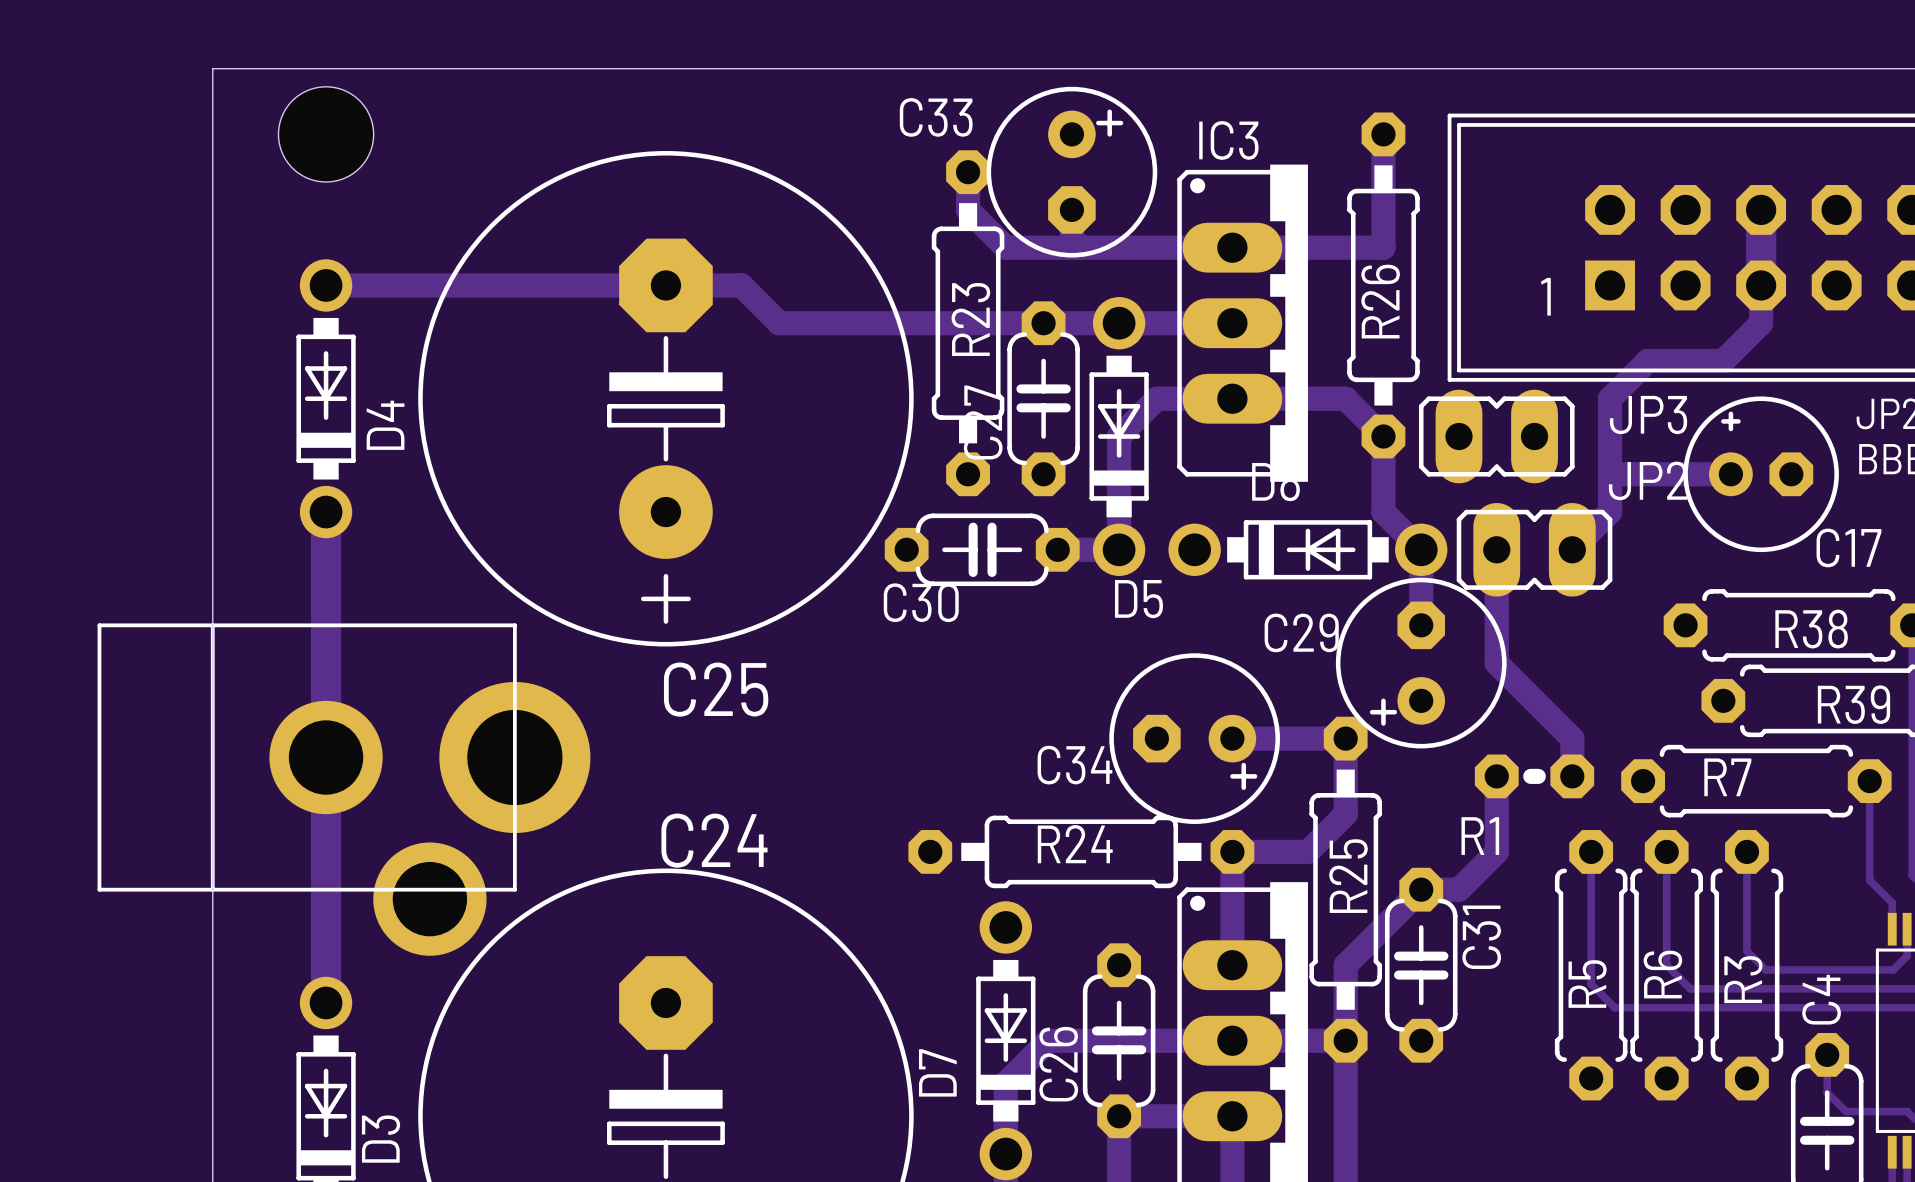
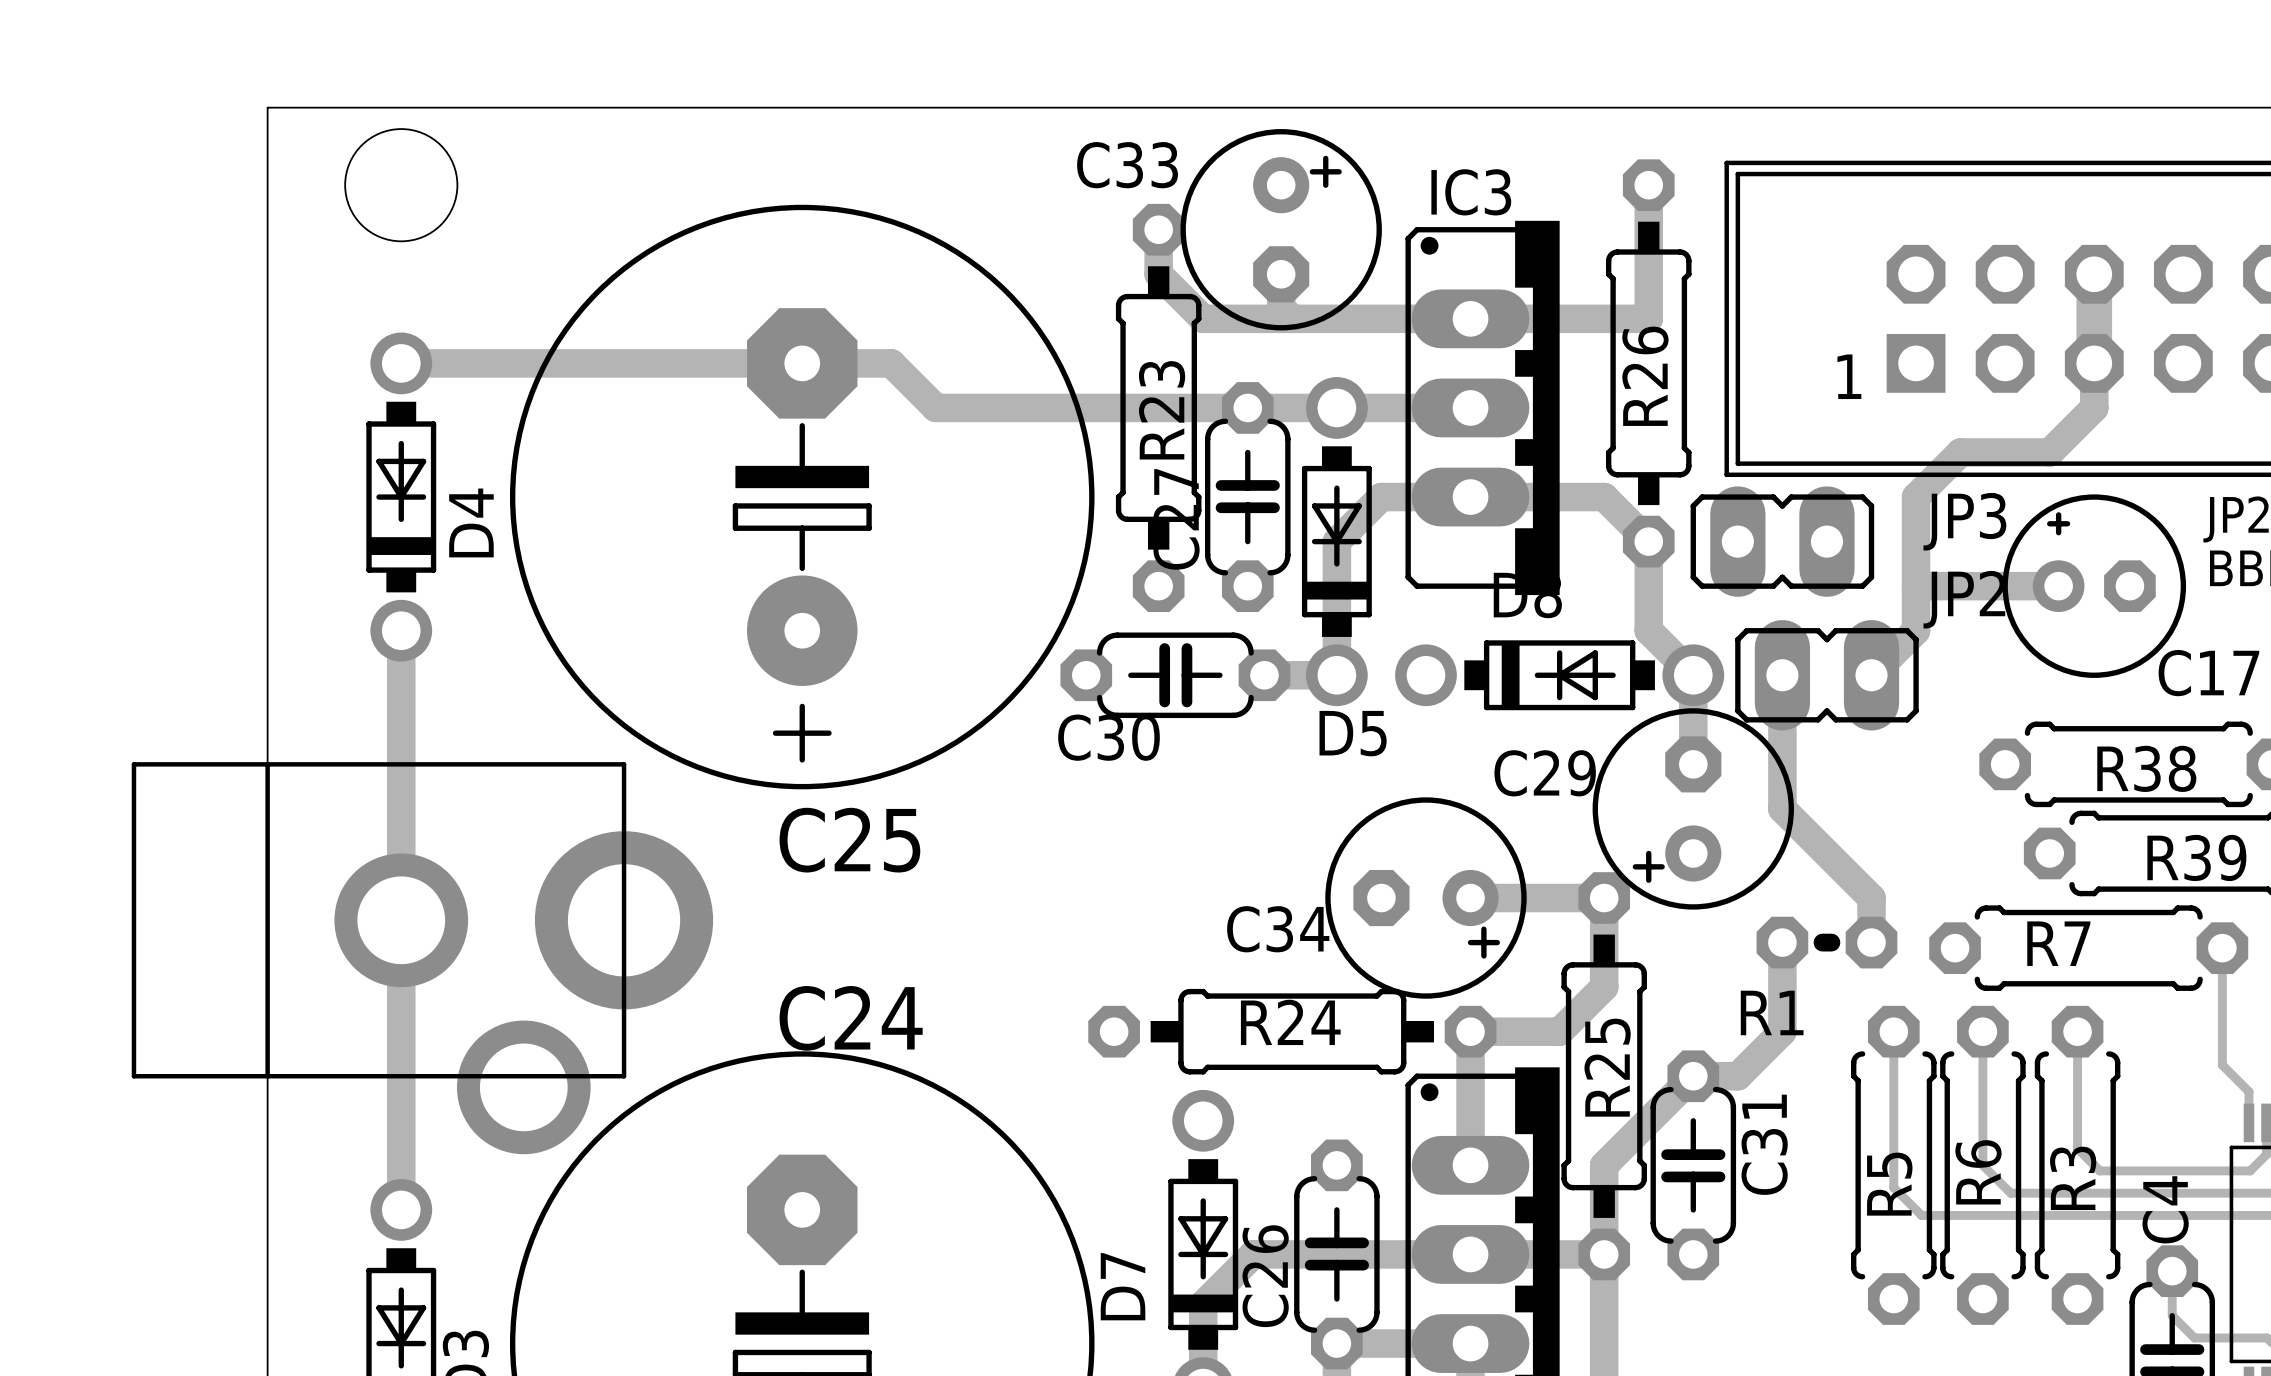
track width: thick (326, 512) (326, 1002) -> thin (401, 630) (401, 1209)

